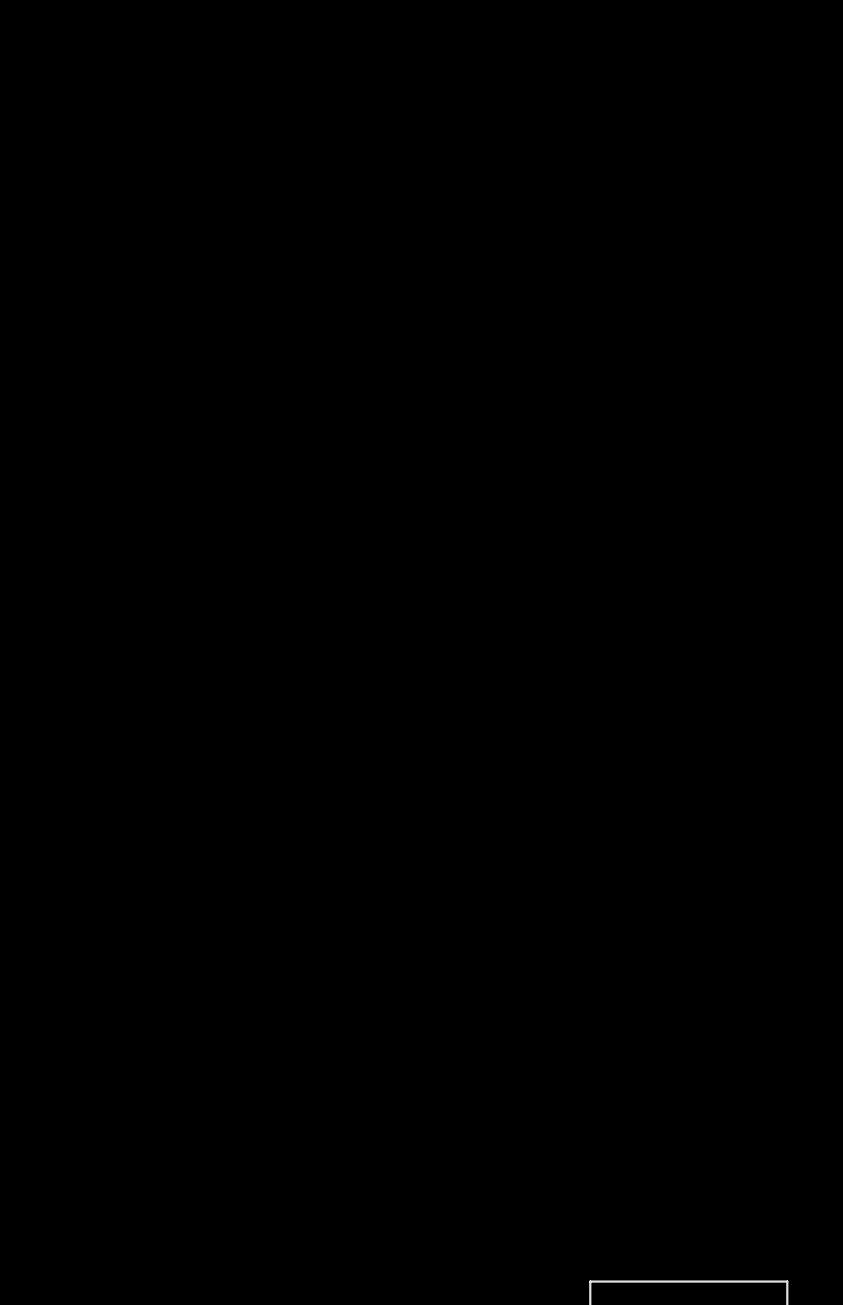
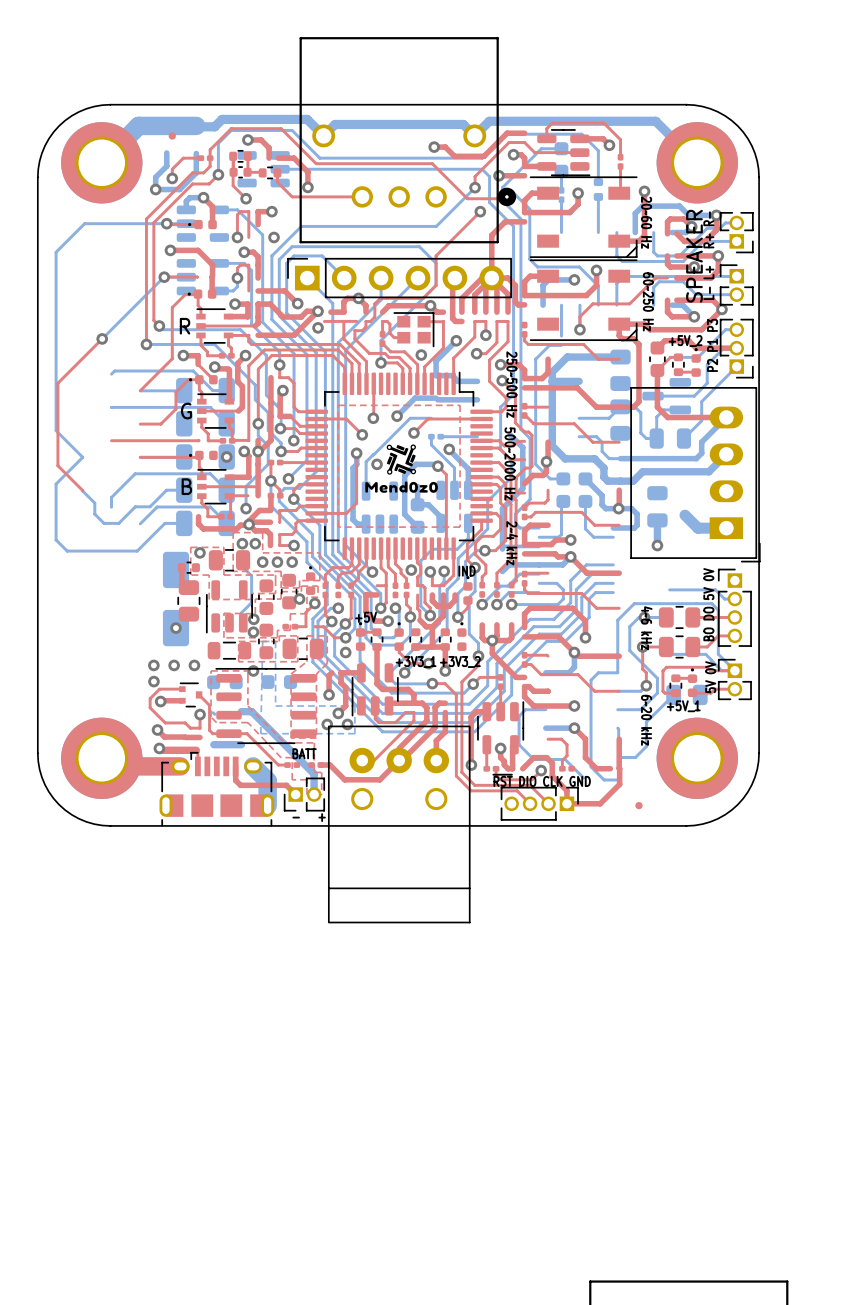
board edge: none -> (110, 104) (686, 104) (702, 106) (717, 111) (731, 120) (743, 132) (754, 153) (759, 177) (759, 753) (757, 769) (751, 784) (743, 798) (731, 810) (710, 821) (686, 825) (110, 825) (94, 824) (78, 818) (65, 810) (53, 798) (41, 777) (37, 753) (38, 169) (45, 145) (59, 125) (71, 115) (86, 108) (110, 104)
top track: none -> (524, 133) (507, 133) (484, 156) (454, 156) (445, 147) (434, 147)
part: none -> (172, 136)
top track: none -> (546, 138) (546, 128) (552, 123) (603, 123) (620, 139) (620, 157)
top track: none -> (579, 138) (603, 138) (609, 145)
top track: none -> (247, 139) (261, 139) (269, 147) (269, 158)
via: none -> (247, 139)
part: none -> (407, 140)
via: none -> (609, 145)
via: none -> (434, 147)
bottom track: none -> (561, 148) (541, 148) (502, 187) (502, 200) (520, 219) (520, 429) (530, 438) (530, 499) (515, 514) (515, 523) (520, 528) (539, 528)
bottom track: none -> (166, 152) (166, 166) (155, 177) (155, 189) (179, 189) (196, 172) (196, 153)
part: none -> (563, 152)
top track: none -> (579, 152) (534, 152) (524, 142) (509, 142) (475, 176) (475, 187)
top track: none -> (513, 154) (521, 154) (524, 158) (524, 166) (546, 166)
via: none -> (513, 154)
part: none -> (240, 156)
top track: none -> (247, 156) (247, 172) (262, 172)
top track: none -> (200, 158) (183, 158) (172, 169) (172, 178)
part: none -> (205, 158)
top track: none -> (278, 158) (294, 158) (307, 172) (307, 187)
part: none -> (561, 160)
part: none -> (620, 161)
bottom track: none -> (101, 162) (138, 125) (214, 126) (222, 119) (307, 119) (323, 135) (335, 124) (463, 124) (474, 135) (489, 121) (655, 121) (697, 162)
part: none -> (101, 162)
part: none -> (697, 162)
top track: none -> (620, 166) (619, 193)
part: none -> (263, 169)
bottom track: none -> (280, 169) (482, 169) (489, 176) (489, 202) (513, 226) (513, 394) (500, 407) (500, 449) (511, 460) (511, 477) (487, 501) (487, 528) (458, 558) (458, 578) (447, 589) (447, 630) (404, 672)
bottom track: none -> (561, 171) (561, 190)
top track: none -> (233, 172) (233, 156) (233, 185) (246, 198)
part: none -> (240, 172)
part: none -> (270, 172)
top track: none -> (277, 172) (277, 182) (292, 196) (362, 196)
top track: none -> (218, 174) (209, 183) (192, 183) (153, 222) (153, 320) (159, 326)
bottom track: none -> (218, 174) (218, 143) (231, 130) (292, 130) (319, 158) (482, 158) (506, 134) (581, 134) (598, 150) (598, 182)
via: none -> (218, 174)
top track: none -> (499, 175) (524, 175)
via: none -> (499, 175)
via: none -> (172, 178)
via: none -> (307, 187)
bottom track: none -> (475, 187) (436, 226) (301, 226) (271, 255) (271, 319) (306, 354) (306, 460) (288, 478)
via: none -> (475, 187)
via: none -> (155, 189)
part: none -> (598, 189)
top track: none -> (644, 191) (644, 235) (638, 241) (619, 241)
via: none -> (644, 191)
top track: none -> (513, 193) (502, 193) (496, 198) (467, 198) (432, 163) (316, 163) (281, 128) (231, 128) (210, 149) (210, 166) (203, 172) (192, 172) (146, 219) (146, 344)
bottom track: none -> (513, 193) (529, 209) (529, 259) (537, 267) (579, 267) (598, 285) (598, 305)
top track: none -> (548, 193) (531, 193) (524, 200) (524, 212) (569, 212) (578, 204) (578, 193)
via: none -> (578, 193)
part: none -> (561, 195)
bottom track: none -> (598, 196) (598, 232)
top track: none -> (203, 197) (212, 206) (212, 224)
bottom track: none -> (203, 197) (189, 197) (186, 201) (186, 209)
via: none -> (203, 197)
via: none -> (246, 198)
bottom track: none -> (561, 199) (561, 232)
bottom track: none -> (219, 209) (237, 209) (262, 234) (262, 322) (294, 353) (293, 440)
top track: none -> (271, 211) (258, 211) (258, 224)
via: none -> (271, 211)
top track: none -> (480, 211) (436, 255) (436, 285) (423, 298) (380, 298) (374, 303) (374, 317) (370, 321) (365, 321) (365, 326) (362, 330) (354, 330) (354, 338) (369, 353) (384, 353) (388, 357) (399, 357) (410, 368) (410, 383)
via: none -> (480, 211)
top track: none -> (716, 215) (716, 230) (705, 241) (684, 241) (676, 233)
bottom track: none -> (716, 215) (688, 215) (679, 206) (642, 206) (635, 213) (635, 232)
via: none -> (716, 215)
part: none -> (583, 217)
top track: none -> (524, 221) (505, 221) (491, 235) (491, 278)
text: none -> 20~60 Hz (646, 222)
bottom track: none -> (736, 222) (725, 222) (720, 228) (707, 228) (679, 255) (657, 255) (653, 252) (653, 232)
top track: none -> (166, 223) (198, 224)
via: none -> (166, 223)
bottom track: none -> (186, 223) (84, 223) (56, 252) (56, 430) (82, 457) (56, 484) (56, 540) (67, 551) (137, 551) (164, 523) (184, 523)
part: none -> (202, 223)
part: none -> (202, 224)
top track: none -> (691, 226) (684, 219) (670, 219) (667, 221) (667, 233)
bottom track: none -> (691, 226) (685, 232) (672, 232)
via: none -> (691, 226)
text: none -> R+ R- (708, 229)
bottom track: none -> (616, 232) (616, 255) (622, 261) (683, 261) (703, 241) (736, 241)
part: none -> (736, 232)
top track: none -> (237, 237) (237, 214) (240, 211) (248, 211) (248, 237)
via: none -> (237, 237)
via: none -> (274, 237)
top track: none -> (170, 250) (198, 250) (212, 264) (212, 276)
via: none -> (170, 250)
top track: none -> (244, 252) (253, 252) (258, 256) (258, 278)
via: none -> (244, 252)
top track: none -> (667, 255) (667, 264) (670, 267) (694, 267)
top track: none -> (676, 255) (718, 255) (718, 270) (710, 278) (676, 278)
via: none -> (718, 255)
text: none -> SPEAKER (694, 256)
bottom track: none -> (219, 263) (244, 263) (251, 270) (251, 324) (279, 352) (279, 365)
via: none -> (694, 267)
top track: none -> (596, 270) (596, 285) (586, 295) (524, 295) (524, 281) (530, 276) (548, 276)
via: none -> (596, 270)
bottom track: none -> (736, 276) (623, 276) (616, 283) (616, 305)
top track: none -> (164, 277) (197, 277)
via: none -> (164, 277)
bottom track: none -> (186, 277) (163, 277) (102, 338)
part: none -> (202, 277)
top track: none -> (212, 277) (212, 294)
top track: none -> (237, 278) (237, 268) (240, 265) (248, 265) (248, 290)
bottom track: none -> (237, 278) (237, 286) (233, 290) (219, 290)
via: none -> (237, 278)
bottom track: none -> (307, 278) (332, 303) (332, 554) (371, 593) (371, 628) (380, 637) (393, 637) (399, 632) (399, 611) (395, 608)
bottom track: none -> (344, 278) (322, 255) (294, 255) (286, 263) (286, 313) (325, 351) (325, 554) (365, 595) (365, 637) (373, 645) (401, 645) (410, 635) (410, 617)
bottom track: none -> (381, 278) (381, 299) (338, 342) (338, 551) (380, 593) (380, 608)
part: none -> (399, 278)
bottom track: none -> (417, 278) (345, 350) (345, 545) (372, 572)
top track: none -> (454, 278) (452, 280) (452, 318) (455, 321) (461, 321)
top track: none -> (491, 278) (508, 294) (508, 312)
top track: none -> (491, 278) (508, 278) (515, 285) (515, 302) (518, 304) (524, 304)
top track: none -> (491, 278) (474, 295) (474, 312)
top track: none -> (491, 278) (496, 283) (496, 312)
top track: none -> (491, 278) (482, 278) (461, 298) (461, 312)
top track: none -> (667, 278) (655, 278) (629, 303) (592, 303) (579, 316) (579, 329)
bottom track: none -> (574, 279) (548, 279) (543, 285) (543, 305)
via: none -> (574, 279)
text: none -> L- L+ (708, 282)
top track: none -> (485, 283) (485, 312)
part: none -> (736, 284)
top track: none -> (258, 290) (284, 290) (297, 303)
top track: none -> (198, 294) (185, 294) (172, 307) (172, 358) (140, 390)
top track: none -> (198, 294) (200, 316)
part: none -> (202, 294)
bottom track: none -> (736, 294) (696, 294) (683, 281) (659, 281) (653, 287) (653, 305)
via: none -> (358, 298)
part: none -> (583, 300)
top track: none -> (667, 300) (667, 312) (672, 316) (694, 316)
top track: none -> (676, 300) (712, 300) (721, 309) (701, 329) (650, 329) (644, 324) (619, 324) (619, 335) (622, 338) (633, 338) (638, 344) (638, 401) (633, 407) (596, 407) (577, 387) (524, 387)
text: none -> 60~250 Hz (648, 301)
via: none -> (297, 303)
top track: none -> (235, 304) (247, 304) (247, 317) (228, 316)
via: none -> (235, 304)
via: none -> (430, 305)
bottom track: none -> (561, 305) (561, 336)
bottom track: none -> (579, 305) (579, 329)
bottom track: none -> (672, 305) (682, 305) (694, 316)
via: none -> (721, 309)
via: none -> (318, 311)
top track: none -> (330, 312) (343, 312) (343, 302) (347, 298) (358, 298) (365, 305) (365, 312)
top track: none -> (382, 312) (389, 305) (430, 305) (436, 312) (443, 312)
via: none -> (694, 316)
top track: none -> (324, 321) (356, 321)
top track: none -> (343, 321) (343, 338) (366, 361) (366, 383)
top track: none -> (424, 321) (443, 321) (443, 348) (424, 367) (424, 383)
bottom track: none -> (159, 326) (163, 329) (240, 329) (266, 355) (266, 395) (281, 409) (280, 428)
via: none -> (159, 326)
text: none -> R (185, 326)
top track: none -> (200, 326) (255, 326) (258, 323) (258, 304) (270, 304) (283, 317) (301, 317) (306, 311) (318, 311) (294, 335) (258, 335)
part: none -> (214, 326)
via: none -> (318, 327)
part: none -> (413, 329)
part: none -> (524, 329)
via: none -> (579, 329)
bottom track: none -> (736, 329) (725, 329) (698, 357) (683, 357)
top track: none -> (382, 334) (382, 321) (387, 321) (389, 324) (389, 333) (394, 337) (403, 337)
top track: none -> (524, 334) (524, 340) (528, 344) (583, 344) (598, 359) (619, 359)
top track: none -> (200, 335) (200, 345) (207, 351) (207, 355) (222, 355)
top track: none -> (485, 335) (485, 321) (474, 321) (474, 337) (453, 358) (453, 383)
via: none -> (485, 335)
top track: none -> (102, 338) (57, 383) (57, 465) (82, 490)
via: none -> (102, 338)
part: none -> (382, 338)
bottom track: none -> (456, 340) (436, 361) (436, 375) (452, 375) (458, 381) (477, 381)
via: none -> (456, 340)
text: none -> +5V_2 (685, 341)
top track: none -> (382, 343) (390, 351) (404, 351) (417, 364) (417, 383)
bottom track: none -> (146, 344) (214, 344) (255, 385) (255, 399) (268, 412) (268, 430) (281, 443) (281, 451)
via: none -> (146, 344)
bottom track: none -> (561, 345) (549, 345) (535, 359) (535, 464) (550, 478) (563, 478)
text: none -> P2 P1 P3 (712, 345)
top track: none -> (657, 348) (664, 340) (688, 340) (696, 348) (736, 348)
bottom track: none -> (736, 348) (723, 348) (707, 364) (707, 383) (694, 396) (653, 396)
part: none -> (736, 348)
top track: none -> (476, 353) (485, 353) (496, 342) (496, 321) (508, 321) (508, 341) (489, 360) (489, 381) (506, 397) (506, 407) (501, 411) (481, 411)
via: none -> (476, 353)
top track: none -> (183, 355) (198, 355) (198, 364) (213, 379)
via: none -> (183, 355)
part: none -> (226, 355)
top track: none -> (231, 355) (228, 335) (248, 335) (248, 341) (251, 344) (340, 344) (359, 363) (359, 383)
top track: none -> (245, 355) (237, 363) (237, 381) (242, 386) (242, 407) (238, 411) (201, 411)
via: none -> (245, 355)
via: none -> (421, 355)
bottom track: none -> (620, 357) (567, 357) (552, 372) (552, 445) (565, 458) (594, 458) (603, 468) (603, 477) (607, 481) (633, 481) (642, 471) (709, 471) (726, 454)
top track: none -> (678, 357) (670, 357) (657, 370) (657, 407) (667, 417) (726, 417)
top track: none -> (548, 359) (548, 372) (542, 378) (524, 378) (524, 370) (519, 364) (500, 364)
part: none -> (657, 359)
top track: none -> (381, 362) (397, 362) (402, 368) (402, 383)
bottom track: none -> (381, 362) (381, 340) (436, 285) (436, 263) (419, 246) (292, 246) (279, 259) (279, 315) (316, 352) (316, 471) (299, 488) (284, 488) (279, 493) (279, 501) (312, 534) (312, 556) (354, 599) (354, 628) (345, 637)
via: none -> (381, 362)
part: none -> (696, 362)
via: none -> (500, 364)
part: none -> (678, 364)
top track: none -> (279, 365) (279, 377) (288, 377) (294, 383) (294, 407) (298, 411) (316, 411)
via: none -> (279, 365)
bottom track: none -> (736, 366) (701, 401) (701, 420) (683, 438)
top track: none -> (214, 367) (229, 369) (229, 401)
via: none -> (214, 367)
part: none -> (620, 370)
top track: none -> (678, 372) (696, 372)
bottom track: none -> (111, 374) (114, 371) (193, 371) (212, 390) (226, 390)
top track: none -> (270, 377) (270, 416)
part: none -> (203, 379)
top track: none -> (502, 380) (515, 393) (515, 422) (524, 432) (528, 432) (531, 435) (531, 466) (525, 468) (516, 477) (516, 490) (518, 493) (524, 493)
via: none -> (502, 380)
bottom track: none -> (552, 381) (579, 381)
top track: none -> (344, 383) (344, 367) (332, 355) (271, 355) (258, 369) (258, 423)
top track: none -> (351, 383) (351, 363) (338, 350) (264, 350) (248, 365) (248, 440) (232, 440) (229, 420)
top track: none -> (373, 383) (373, 418)
text: none -> 250~500 Hz (511, 384)
bottom track: none -> (184, 390) (140, 390)
part: none -> (205, 390)
top track: none -> (282, 390) (280, 393) (280, 416) (290, 416) (300, 426) (316, 426)
via: none -> (282, 390)
part: none -> (666, 396)
bottom track: none -> (477, 399) (415, 398) (397, 416)
top track: none -> (201, 401) (199, 379) (188, 379) (175, 392) (175, 409) (160, 424) (140, 424)
top zone outline: none -> (338, 405) (460, 405) (460, 527) (338, 527) (338, 405)
top track: none -> (524, 406) (548, 407)
bottom track: none -> (111, 407) (210, 407) (226, 423)
bottom track: none -> (680, 409) (663, 409) (656, 417) (656, 438) (646, 438) (640, 433) (640, 412) (634, 406) (620, 406) (609, 418) (579, 418)
part: none -> (524, 410)
text: none -> G (186, 411)
part: none -> (215, 411)
top track: none -> (524, 415) (533, 423) (574, 423) (592, 442) (619, 442)
top track: none -> (270, 416) (270, 440)
via: none -> (397, 416)
bottom track: none -> (726, 417) (701, 442) (701, 453) (696, 458) (609, 458) (602, 451) (602, 442) (596, 436) (579, 436)
via: none -> (373, 418)
bottom track: none -> (431, 418) (410, 418) (366, 461) (366, 491)
top track: none -> (316, 419) (346, 419) (362, 434)
top track: none -> (481, 419) (427, 419) (413, 433)
top track: none -> (201, 420) (201, 427) (208, 433) (208, 440) (222, 440)
part: none -> (620, 420)
part: none -> (205, 423)
bottom track: none -> (258, 423) (258, 436) (268, 445) (268, 464) (246, 486) (246, 508)
via: none -> (258, 423)
top track: none -> (280, 428) (295, 428) (300, 433) (316, 433)
via: none -> (280, 428)
via: none -> (413, 433)
via: none -> (362, 434)
bottom track: none -> (510, 434) (522, 447) (522, 488) (502, 508) (502, 549) (505, 546) (539, 546)
bottom track: none -> (431, 436) (431, 444) (454, 468) (454, 490)
part: none -> (436, 436)
bottom track: none -> (440, 436) (477, 436)
part: none -> (670, 438)
top track: none -> (111, 440) (198, 440)
part: none -> (227, 440)
top track: none -> (258, 440) (258, 495)
top track: none -> (270, 440) (258, 451)
via: none -> (293, 440)
top track: none -> (481, 440) (499, 440) (504, 445) (513, 445) (518, 441) (524, 441)
top track: none -> (548, 442) (548, 460)
drawing: none -> [365, 444, 438, 493]
top track: none -> (316, 448) (301, 448) (297, 451) (281, 451)
top track: none -> (481, 448) (499, 448) (511, 460) (524, 459)
bottom track: none -> (449, 449) (468, 468) (468, 490)
via: none -> (449, 449)
top track: none -> (244, 451) (248, 456) (248, 477) (229, 477)
via: none -> (244, 451)
via: none -> (258, 451)
via: none -> (281, 451)
top track: none -> (356, 453) (356, 503) (346, 513) (316, 513)
bottom track: none -> (356, 453) (356, 464) (353, 468) (353, 519) (357, 524) (366, 524)
via: none -> (356, 453)
part: none -> (203, 455)
part: none -> (205, 456)
via: none -> (226, 456)
top track: none -> (140, 457) (197, 457) (199, 455) (201, 477)
top track: none -> (546, 461) (546, 472) (543, 475) (532, 475) (524, 483)
via: none -> (546, 461)
part: none -> (275, 462)
top track: none -> (280, 462) (316, 462)
top track: none -> (481, 462) (498, 462) (510, 474) (510, 494) (516, 500) (516, 580) (511, 585)
text: none -> 500~2000 Hz (510, 463)
top track: none -> (270, 464) (270, 480) (279, 492)
via: none -> (377, 464)
part: none -> (399, 465)
top track: none -> (437, 466) (446, 474) (446, 548)
bottom track: none -> (437, 466) (436, 464) (415, 464) (404, 475) (404, 514) (417, 527)
via: none -> (437, 466)
part: none -> (695, 474)
top track: none -> (258, 477) (258, 486) (201, 486)
top track: none -> (481, 477) (498, 477) (505, 484) (505, 499) (510, 504) (510, 559) (496, 573) (496, 585)
via: none -> (288, 478)
bottom track: none -> (585, 478) (602, 495) (602, 504) (605, 508) (631, 508) (637, 514) (637, 525) (634, 528) (613, 528)
bottom track: none -> (270, 480) (270, 505) (306, 541) (306, 562) (327, 582) (327, 604) (312, 618) (312, 662) (382, 731) (474, 731) (511, 694) (511, 676) (546, 641) (565, 641) (589, 617) (589, 599) (595, 592) (613, 592)
via: none -> (270, 480)
top track: none -> (316, 484) (299, 484) (293, 490) (293, 499)
top track: none -> (481, 484) (496, 484) (500, 488) (500, 503) (505, 508) (505, 540) (495, 550) (484, 550)
text: none -> B (186, 486)
part: none -> (215, 486)
bottom track: none -> (417, 486) (417, 504) (428, 504) (440, 516) (440, 523)
bottom track: none -> (184, 490) (166, 490) (150, 506) (135, 506) (118, 523) (104, 523) (94, 514) (94, 503) (82, 490)
part: none -> (205, 490)
bottom track: none -> (226, 490) (210, 473) (135, 473) (111, 497) (111, 507)
top track: none -> (548, 490) (548, 499) (544, 503) (529, 503) (524, 507)
part: none -> (563, 490)
part: none -> (585, 490)
top track: none -> (619, 490) (618, 508)
top track: none -> (247, 495) (229, 496) (230, 516)
top track: none -> (270, 495) (270, 510) (259, 510) (249, 520) (249, 524) (255, 530) (266, 530) (270, 534) (270, 545)
part: none -> (275, 495)
top track: none -> (201, 496) (201, 503) (207, 509) (207, 516) (221, 516)
bottom track: none -> (293, 499) (319, 525) (319, 556) (360, 596) (360, 661) (391, 693) (464, 693) (473, 684)
via: none -> (293, 499)
bottom track: none -> (563, 501) (561, 503) (561, 534) (558, 537) (539, 537)
bottom track: none -> (585, 501) (585, 528) (593, 537) (613, 537)
top track: none -> (316, 506) (300, 506) (295, 510) (279, 510) (279, 522)
part: none -> (454, 506)
part: none -> (657, 506)
part: none -> (379, 507)
via: none -> (246, 508)
via: none -> (618, 508)
part: none -> (524, 512)
top track: none -> (481, 513) (496, 513) (500, 517) (500, 529) (493, 536) (482, 536) (475, 543) (475, 554) (485, 565) (482, 585)
bottom track: none -> (685, 515) (698, 528) (726, 528)
top track: none -> (198, 516) (198, 524) (203, 528) (236, 528) (240, 525) (248, 525) (251, 522) (270, 522)
part: none -> (225, 516)
part: none -> (417, 516)
top track: none -> (524, 516) (531, 516) (535, 512) (581, 512) (594, 525) (619, 525)
top track: none -> (316, 520) (298, 520) (295, 523) (295, 530) (292, 534) (279, 534) (279, 545) (294, 545)
top track: none -> (481, 520) (481, 529) (467, 543) (467, 560) (475, 567)
bottom track: none -> (657, 520) (657, 545)
part: none -> (205, 523)
bottom track: none -> (226, 523) (210, 507) (157, 507) (140, 523)
bottom track: none -> (468, 523) (468, 538) (457, 549) (432, 549) (420, 560) (420, 606) (430, 615)
via: none -> (249, 524)
top track: none -> (548, 525) (530, 525) (524, 530) (524, 544) (551, 544) (555, 540) (570, 540)
top zone outline: none -> (233, 532) (262, 532) (262, 552) (319, 552) (319, 580) (299, 580) (299, 587) (281, 587) (281, 571) (233, 571) (233, 532)
via: none -> (570, 540)
via: none -> (242, 543)
via: none -> (255, 543)
text: none -> 2~4 kHz (512, 543)
via: none -> (294, 545)
via: none -> (657, 545)
top zone outline: none -> (190, 547) (190, 575) (209, 575) (209, 599) (251, 599) (251, 593) (275, 593) (275, 575) (223, 575) (223, 547) (190, 547)
top track: none -> (351, 548) (351, 564) (348, 567) (332, 567) (325, 575) (325, 585)
top track: none -> (359, 548) (359, 564) (350, 572) (342, 572) (338, 576) (338, 585)
top track: none -> (366, 548) (366, 564) (358, 572) (358, 578) (351, 585)
top track: none -> (381, 548) (381, 567) (386, 573) (386, 602) (380, 608)
top track: none -> (388, 548) (388, 566) (395, 574) (395, 585)
top track: none -> (395, 548) (395, 564) (406, 578) (406, 585)
top track: none -> (417, 548) (417, 562) (420, 566) (417, 585) (422, 585) (425, 587) (425, 602) (430, 607) (430, 615)
top track: none -> (453, 548) (453, 575) (443, 585) (432, 585) (432, 573) (430, 571)
bottom track: none -> (484, 550) (476, 550) (465, 561) (465, 586) (457, 593) (457, 617)
via: none -> (484, 550)
via: none -> (199, 552)
top track: none -> (524, 553) (555, 553) (558, 556) (570, 556) (587, 573) (619, 573)
bottom track: none -> (570, 556) (562, 564) (509, 564) (502, 571)
via: none -> (570, 556)
part: none -> (229, 560)
via: none -> (262, 562)
via: none -> (277, 562)
via: none -> (292, 562)
bottom track: none -> (613, 564) (586, 564) (570, 580) (570, 602) (554, 619) (530, 619) (487, 661) (487, 685) (469, 704) (382, 704) (334, 656) (334, 634) (345, 623)
bottom track: none -> (241, 565) (251, 575) (251, 602) (241, 612) (241, 617)
top track: none -> (181, 567) (181, 580) (188, 587)
part: none -> (188, 567)
bottom track: none -> (475, 567) (475, 591) (469, 597) (469, 634) (478, 643) (478, 656)
via: none -> (475, 567)
via: none -> (411, 570)
via: none -> (430, 571)
bottom track: none -> (444, 571) (444, 581) (439, 586) (439, 623) (391, 670) (391, 680) (395, 683) (432, 683)
via: none -> (444, 571)
text: none -> IND (467, 571)
via: none -> (372, 572)
top track: none -> (548, 573) (524, 574)
bottom track: none -> (539, 574) (520, 574) (508, 586) (500, 586) (482, 604)
bottom track: none -> (613, 574) (591, 574) (576, 589) (576, 610) (559, 626) (533, 626) (496, 663) (496, 687) (471, 713) (382, 713) (325, 656) (325, 627) (331, 621)
part: none -> (524, 578)
part: none -> (310, 580)
top track: none -> (524, 583) (524, 589) (528, 593) (581, 593) (596, 608) (619, 608)
bottom track: none -> (539, 583) (556, 583) (563, 589) (563, 599) (557, 604) (511, 604)
bottom track: none -> (613, 583) (595, 583) (581, 597) (581, 613) (561, 634) (539, 634) (504, 669) (504, 691) (472, 722) (382, 722) (318, 658) (318, 621) (330, 608) (338, 608)
top track: none -> (377, 585) (386, 585)
top zone outline: none -> (301, 586) (301, 591) (281, 591) (281, 599) (255, 599) (255, 613) (223, 613) (223, 637) (277, 637) (277, 630) (290, 630) (290, 613) (306, 613) (306, 597) (318, 597) (318, 586) (301, 586)
part: none -> (482, 589)
part: none -> (496, 589)
part: none -> (511, 589)
bottom track: none -> (669, 589) (715, 589) (724, 599) (734, 599)
part: none -> (325, 590)
part: none -> (338, 590)
part: none -> (351, 590)
part: none -> (395, 590)
part: none -> (406, 590)
part: none -> (467, 590)
part: none -> (289, 591)
bottom track: none -> (539, 592) (508, 592) (496, 604)
top track: none -> (325, 594) (325, 615) (331, 621)
top track: none -> (351, 594) (351, 618) (345, 623)
top track: none -> (377, 594) (365, 594) (365, 611) (375, 621) (388, 621)
top track: none -> (406, 594) (406, 604) (410, 608) (410, 617)
top track: none -> (417, 594) (419, 620) (426, 626) (432, 626)
top track: none -> (432, 594) (432, 600) (437, 606) (448, 606) (455, 600) (455, 594)
top track: none -> (443, 594) (443, 615) (432, 626) (432, 647)
part: none -> (266, 597)
part: none -> (175, 599)
via: none -> (299, 599)
part: none -> (188, 600)
top track: none -> (467, 600) (467, 607) (457, 617)
top track: none -> (314, 603) (305, 612) (305, 626) (295, 626)
via: none -> (314, 603)
via: none -> (482, 604)
via: none -> (496, 604)
via: none -> (511, 604)
text: none -> BO DO 5V 0V (708, 604)
part: none -> (229, 606)
part: none -> (734, 607)
via: none -> (338, 608)
via: none -> (380, 608)
via: none -> (395, 608)
via: none -> (430, 615)
text: none -> +5V (366, 617)
via: none -> (410, 617)
via: none -> (457, 617)
via: none -> (644, 617)
bottom track: none -> (666, 617) (638, 617) (629, 626) (629, 650) (657, 678) (657, 693) (640, 709) (617, 709)
part: none -> (679, 617)
top track: none -> (692, 617) (734, 617)
via: none -> (253, 619)
via: none -> (331, 621)
via: none -> (388, 621)
via: none -> (345, 623)
top track: none -> (496, 624) (496, 635) (492, 640) (492, 653) (516, 677) (524, 677)
top track: none -> (511, 624) (511, 637) (508, 640) (484, 640) (482, 637) (482, 624)
part: none -> (290, 626)
top track: none -> (315, 626) (323, 626) (334, 637) (345, 637)
top track: none -> (524, 627) (524, 613) (530, 608) (572, 608) (585, 621) (585, 637)
via: none -> (175, 628)
text: none -> 4~6 kHz (646, 628)
via: none -> (253, 632)
top track: none -> (377, 632) (360, 632)
top zone outline: none -> (279, 635) (297, 635) (297, 661) (238, 661) (238, 641) (279, 641) (279, 635)
top zone outline: none -> (306, 635) (306, 661) (291, 673) (291, 738) (316, 738) (316, 673) (327, 663) (327, 635) (306, 635)
top track: none -> (734, 635) (718, 635) (707, 646) (692, 646)
part: none -> (360, 636)
part: none -> (399, 636)
part: none -> (461, 636)
top track: none -> (524, 636) (558, 636) (578, 656) (619, 656)
via: none -> (345, 637)
via: none -> (585, 637)
part: none -> (377, 639)
part: none -> (415, 639)
part: none -> (445, 639)
via: none -> (492, 640)
bottom zone outline: none -> (262, 641) (275, 641) (275, 706) (354, 706) (354, 733) (260, 733) (262, 641)
part: none -> (266, 641)
top track: none -> (399, 646) (399, 652) (410, 663) (428, 663)
via: none -> (642, 646)
top track: none -> (666, 646) (642, 646) (642, 669) (646, 672) (646, 685)
part: none -> (679, 646)
top track: none -> (377, 647) (377, 683) (382, 689) (408, 689) (413, 694) (413, 703)
top track: none -> (415, 647) (445, 647) (445, 670)
part: none -> (303, 648)
part: none -> (229, 650)
via: none -> (345, 652)
bottom track: none -> (574, 652) (574, 667) (568, 672) (545, 672)
via: none -> (574, 652)
bottom track: none -> (669, 654) (705, 654) (721, 670) (734, 670) (718, 654) (718, 610) (711, 603) (634, 603) (617, 620) (617, 672) (598, 672) (591, 680) (591, 766) (604, 779) (618, 779)
top track: none -> (524, 655) (548, 656)
top track: none -> (478, 656) (478, 665) (461, 682) (461, 772) (474, 785) (530, 785) (548, 803)
via: none -> (478, 656)
part: none -> (524, 659)
text: none -> +3V3_1 (416, 661)
text: none -> +3V3_2 (460, 661)
via: none -> (428, 663)
top track: none -> (524, 664) (531, 664) (541, 674) (578, 674) (594, 691) (619, 691)
via: none -> (153, 665)
via: none -> (174, 665)
via: none -> (194, 665)
top zone outline: none -> (211, 670) (211, 717) (216, 722) (247, 722) (281, 757) (292, 757) (292, 779) (306, 779) (306, 794) (321, 794) (321, 772) (314, 772) (314, 742) (284, 742) (247, 706) (247, 670) (211, 670)
via: none -> (253, 670)
via: none -> (445, 670)
top track: none -> (734, 670) (710, 670) (707, 667) (666, 667) (662, 670) (662, 691) (664, 693) (675, 693)
top track: none -> (331, 672) (329, 675) (329, 694)
top track: none -> (361, 672) (341, 672) (341, 682) (345, 687) (345, 706) (338, 713)
via: none -> (404, 672)
top track: none -> (500, 677) (479, 677) (473, 684)
text: none -> 5V 0V (710, 677)
top track: none -> (675, 678) (692, 678)
part: none -> (734, 679)
via: none -> (153, 681)
part: none -> (224, 682)
part: none -> (279, 682)
part: none -> (500, 682)
part: none -> (692, 682)
top track: none -> (432, 683) (445, 683) (456, 694) (456, 776) (471, 790) (517, 790) (530, 803)
via: none -> (432, 683)
via: none -> (473, 684)
bottom track: none -> (646, 685) (640, 691) (617, 691)
via: none -> (646, 685)
part: none -> (675, 685)
top track: none -> (500, 686) (500, 711)
top track: none -> (182, 689) (159, 689) (150, 698) (150, 707) (165, 722) (185, 722) (190, 728) (200, 728) (200, 714)
part: none -> (375, 689)
top track: none -> (734, 689) (714, 689) (710, 693) (692, 692)
top track: none -> (548, 691) (533, 691) (529, 686) (524, 686) (524, 696) (533, 706) (574, 706)
part: none -> (190, 694)
top track: none -> (199, 694) (209, 705) (209, 730) (212, 733) (247, 733) (278, 765) (287, 765)
via: none -> (329, 694)
bottom track: none -> (673, 694) (646, 722) (646, 746) (635, 757) (618, 757) (617, 728)
part: none -> (686, 694)
top track: none -> (182, 700) (160, 701)
via: none -> (160, 701)
top track: none -> (445, 703) (439, 703) (435, 707) (435, 727) (402, 759) (399, 759)
top track: none -> (375, 705) (375, 718) (378, 722) (395, 722) (405, 712) (413, 712) (413, 720) (374, 760) (362, 760)
top track: none -> (389, 705) (391, 703) (422, 703) (426, 707) (426, 720) (399, 748) (399, 760) (379, 779) (344, 779) (330, 765) (320, 765)
part: none -> (265, 706)
via: none -> (574, 706)
text: none -> +5V_1 (683, 706)
bottom track: none -> (545, 709) (525, 709) (519, 716) (519, 744) (533, 759) (565, 759) (583, 777)
bottom track: none -> (241, 711) (251, 711) (314, 774) (314, 794)
top track: none -> (486, 711) (476, 711) (471, 717) (471, 765)
bottom track: none -> (213, 712) (214, 714)
top track: none -> (445, 712) (445, 731) (436, 740) (436, 760)
via: none -> (338, 713)
via: none -> (200, 714)
text: none -> 6~20 kHz (646, 720)
via: none -> (327, 724)
via: none -> (347, 724)
part: none -> (500, 727)
bottom track: none -> (545, 728) (574, 728)
top track: none -> (574, 728) (585, 739) (585, 757) (596, 768) (610, 768)
via: none -> (574, 728)
top track: none -> (157, 729) (164, 737) (199, 737)
via: none -> (157, 729)
top track: none -> (548, 739) (561, 739) (567, 744) (567, 755) (562, 760) (562, 768)
top track: none -> (619, 739) (619, 784) (600, 803) (566, 803) (566, 790) (552, 776) (552, 763) (546, 757) (533, 757) (521, 768)
bottom track: none -> (213, 744) (241, 744)
top track: none -> (486, 744) (486, 768)
top track: none -> (514, 744) (512, 746) (512, 768) (508, 768) (504, 765) (504, 761) (500, 757) (500, 748)
top track: none -> (159, 748) (161, 750) (196, 750) (197, 766)
via: none -> (159, 748)
via: none -> (500, 748)
text: none -> BATT (304, 753)
top track: none -> (101, 758) (109, 766) (180, 766)
part: none -> (101, 758)
part: none -> (697, 758)
part: none -> (292, 765)
part: none -> (316, 765)
via: none -> (471, 765)
top track: none -> (235, 766) (235, 780) (240, 785) (286, 785) (295, 794)
bottom track: none -> (253, 766) (267, 780) (267, 805)
part: none -> (491, 768)
top track: none -> (496, 768) (496, 775) (500, 779) (531, 779) (541, 770)
part: none -> (567, 768)
via: none -> (541, 770)
text: none -> ~{RST} DIO CLK GND (541, 780)
part: none -> (216, 789)
part: none -> (304, 794)
part: none -> (539, 803)
part: none -> (638, 805)
text: none -> - + (309, 817)
part: none -> (399, 824)

